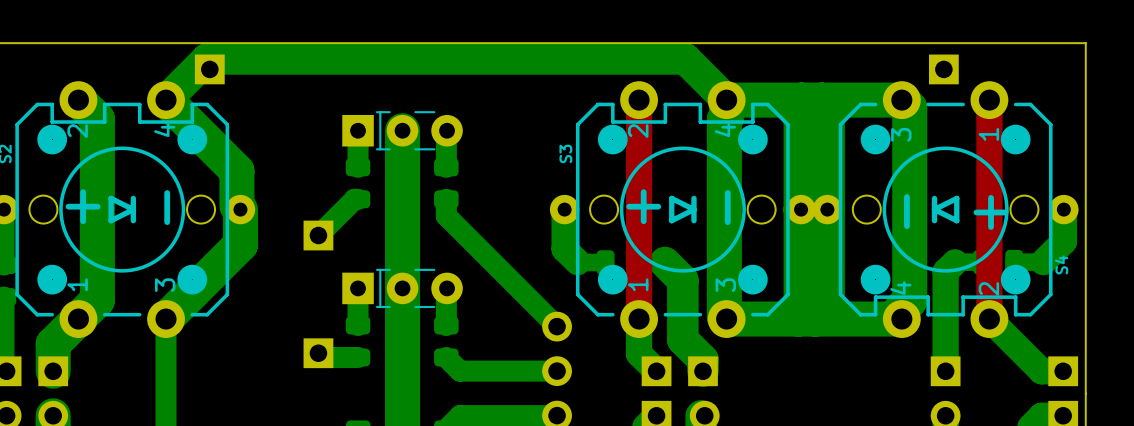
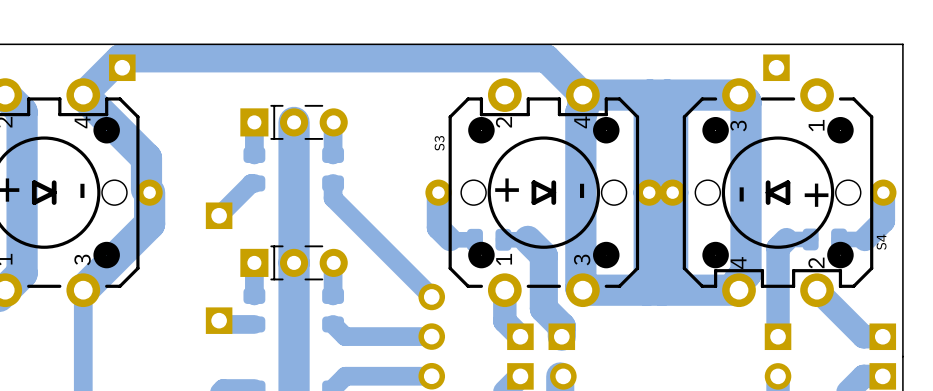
top track: (639, 100) (639, 319) -> none
top track: (989, 100) (989, 319) -> none

